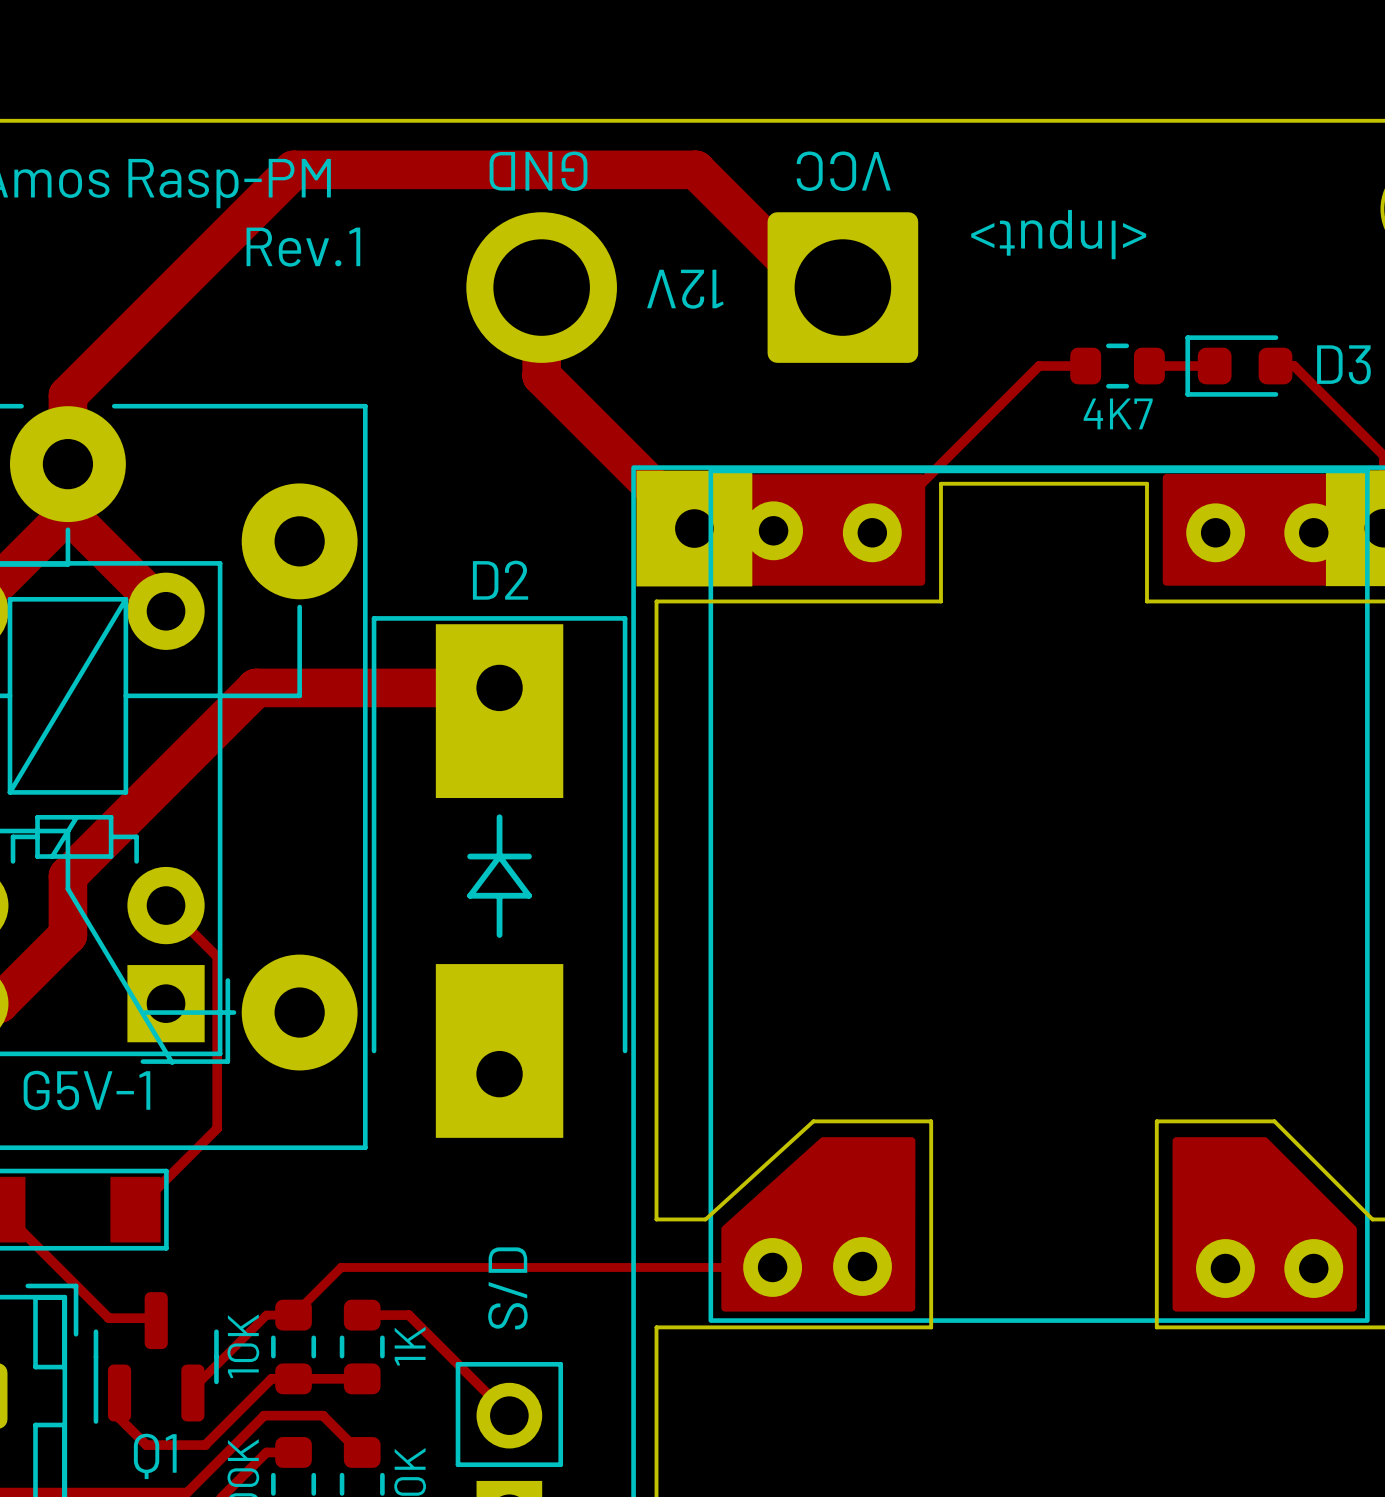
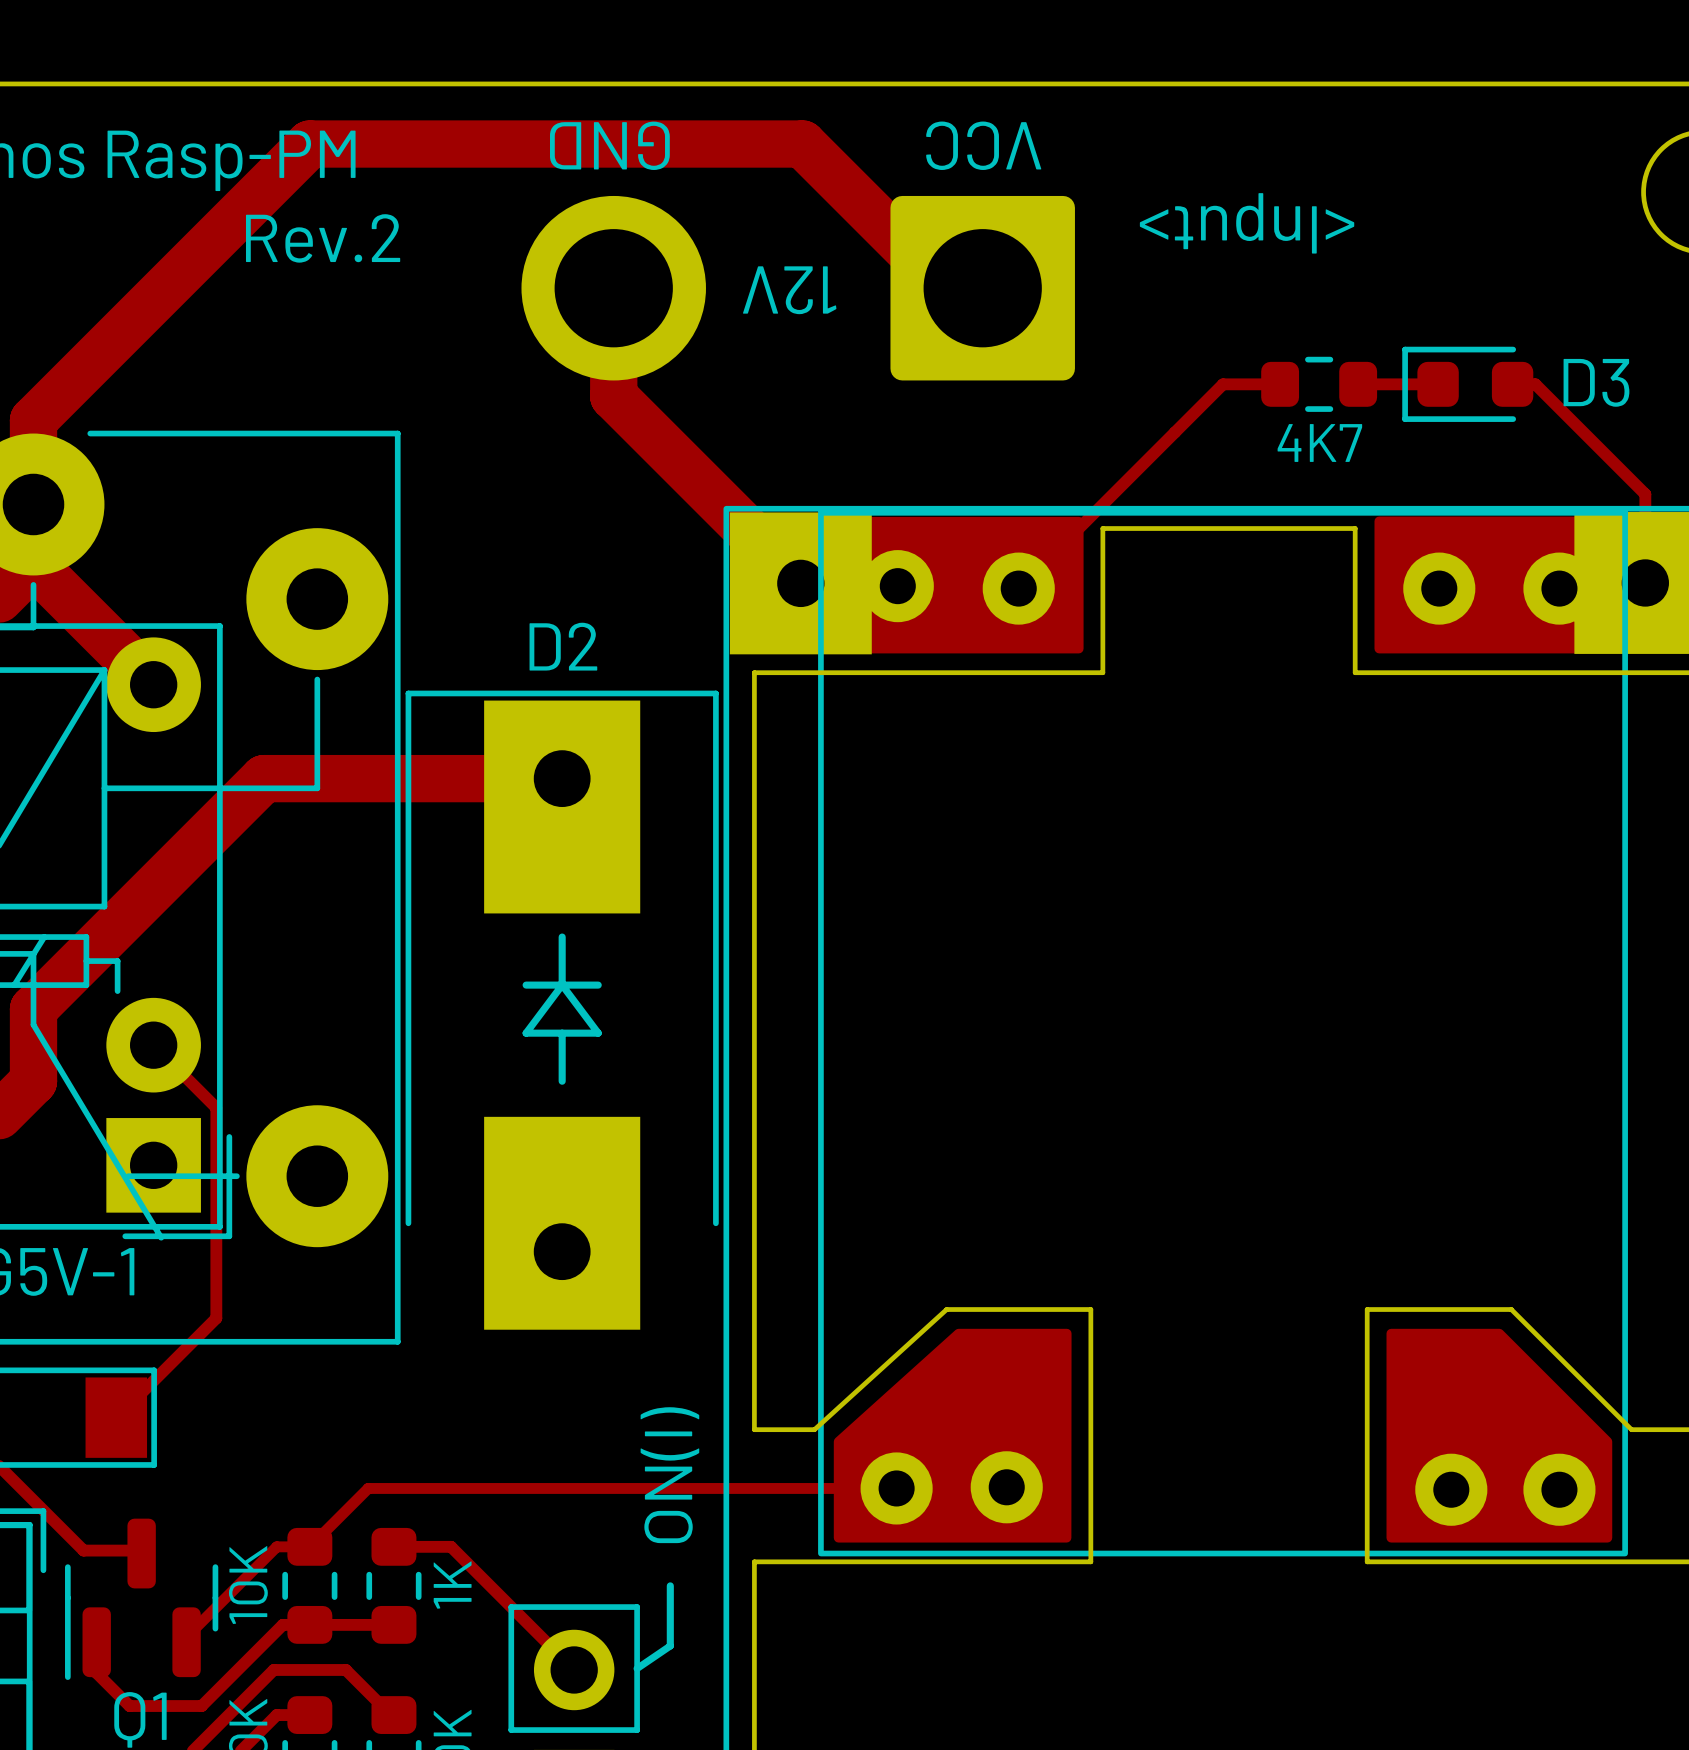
text: Rev.1 (303, 247) -> Rev.2 (323, 238)
text: none -> ON(I) (669, 1475)
text: S/D (507, 1288) -> none
line: none -> (670, 1585) (670, 1645) (637, 1668)

